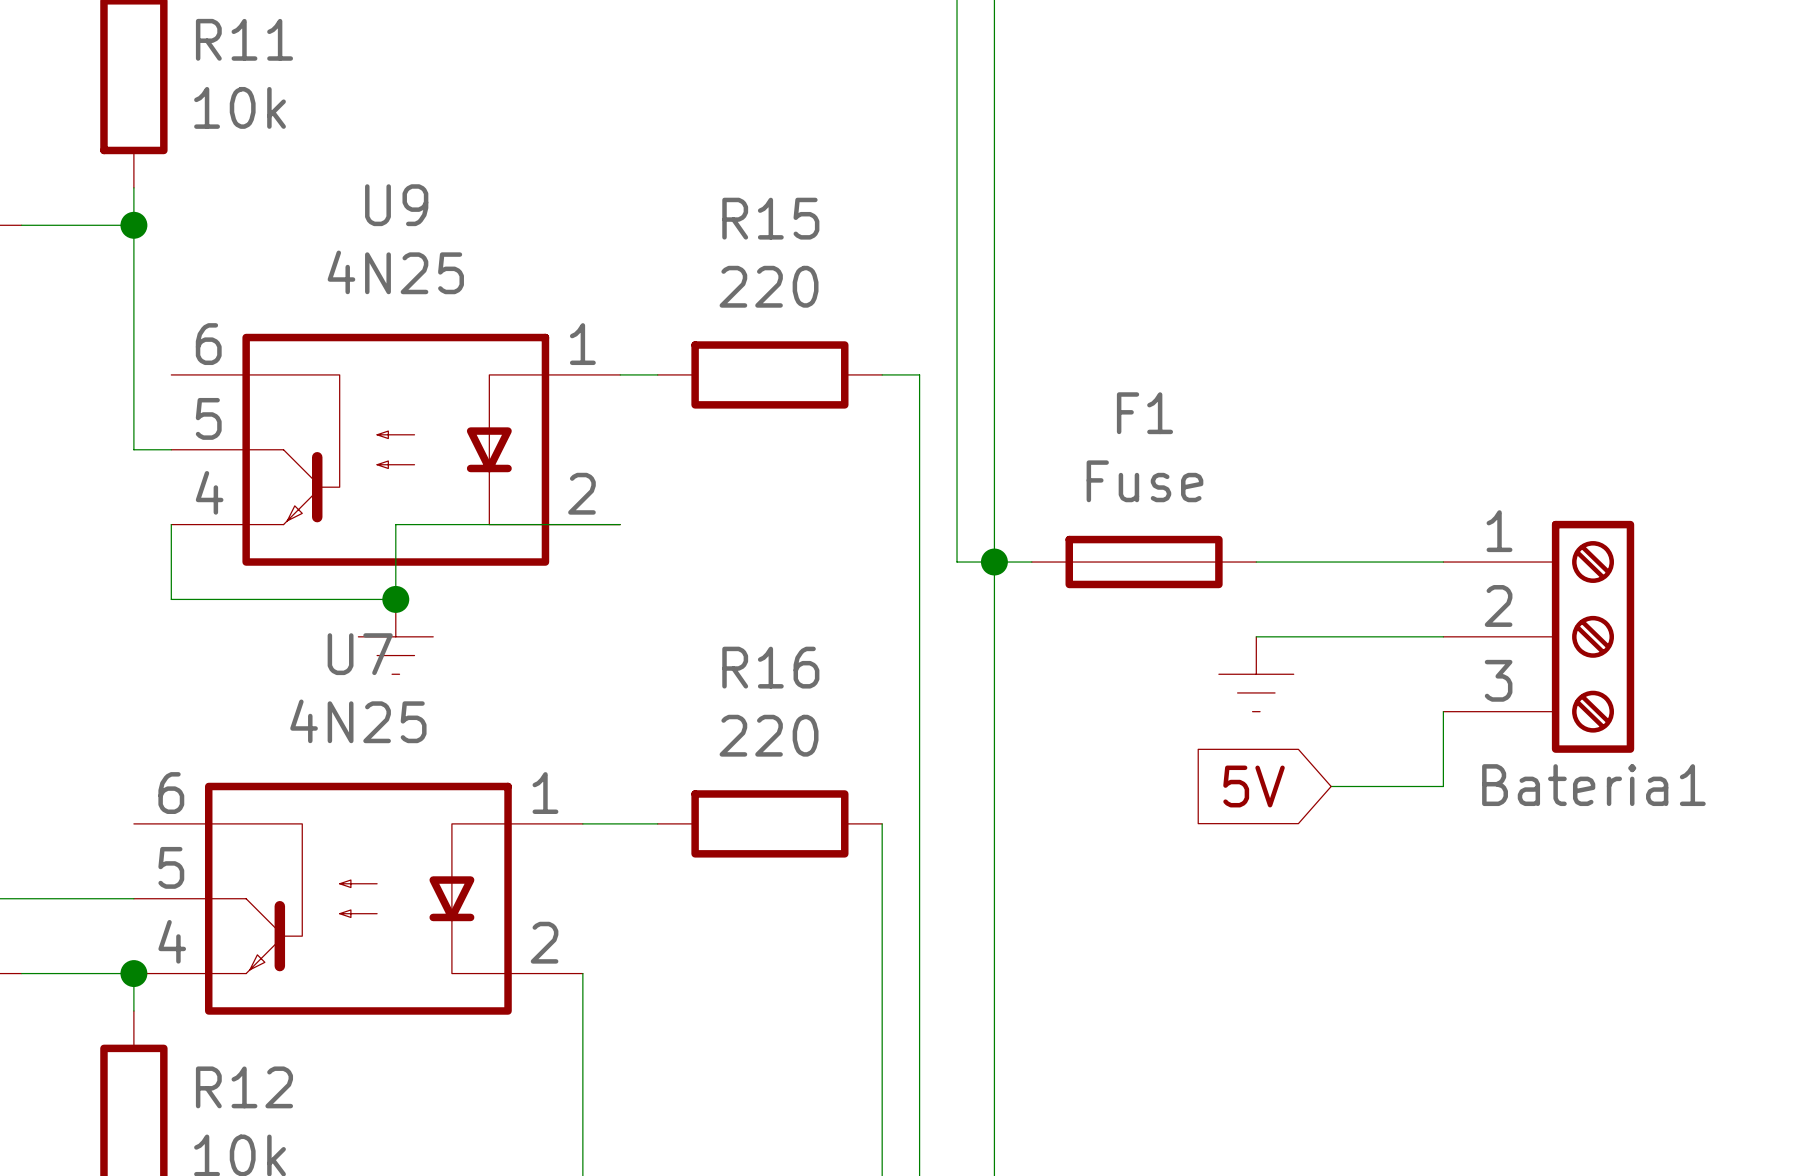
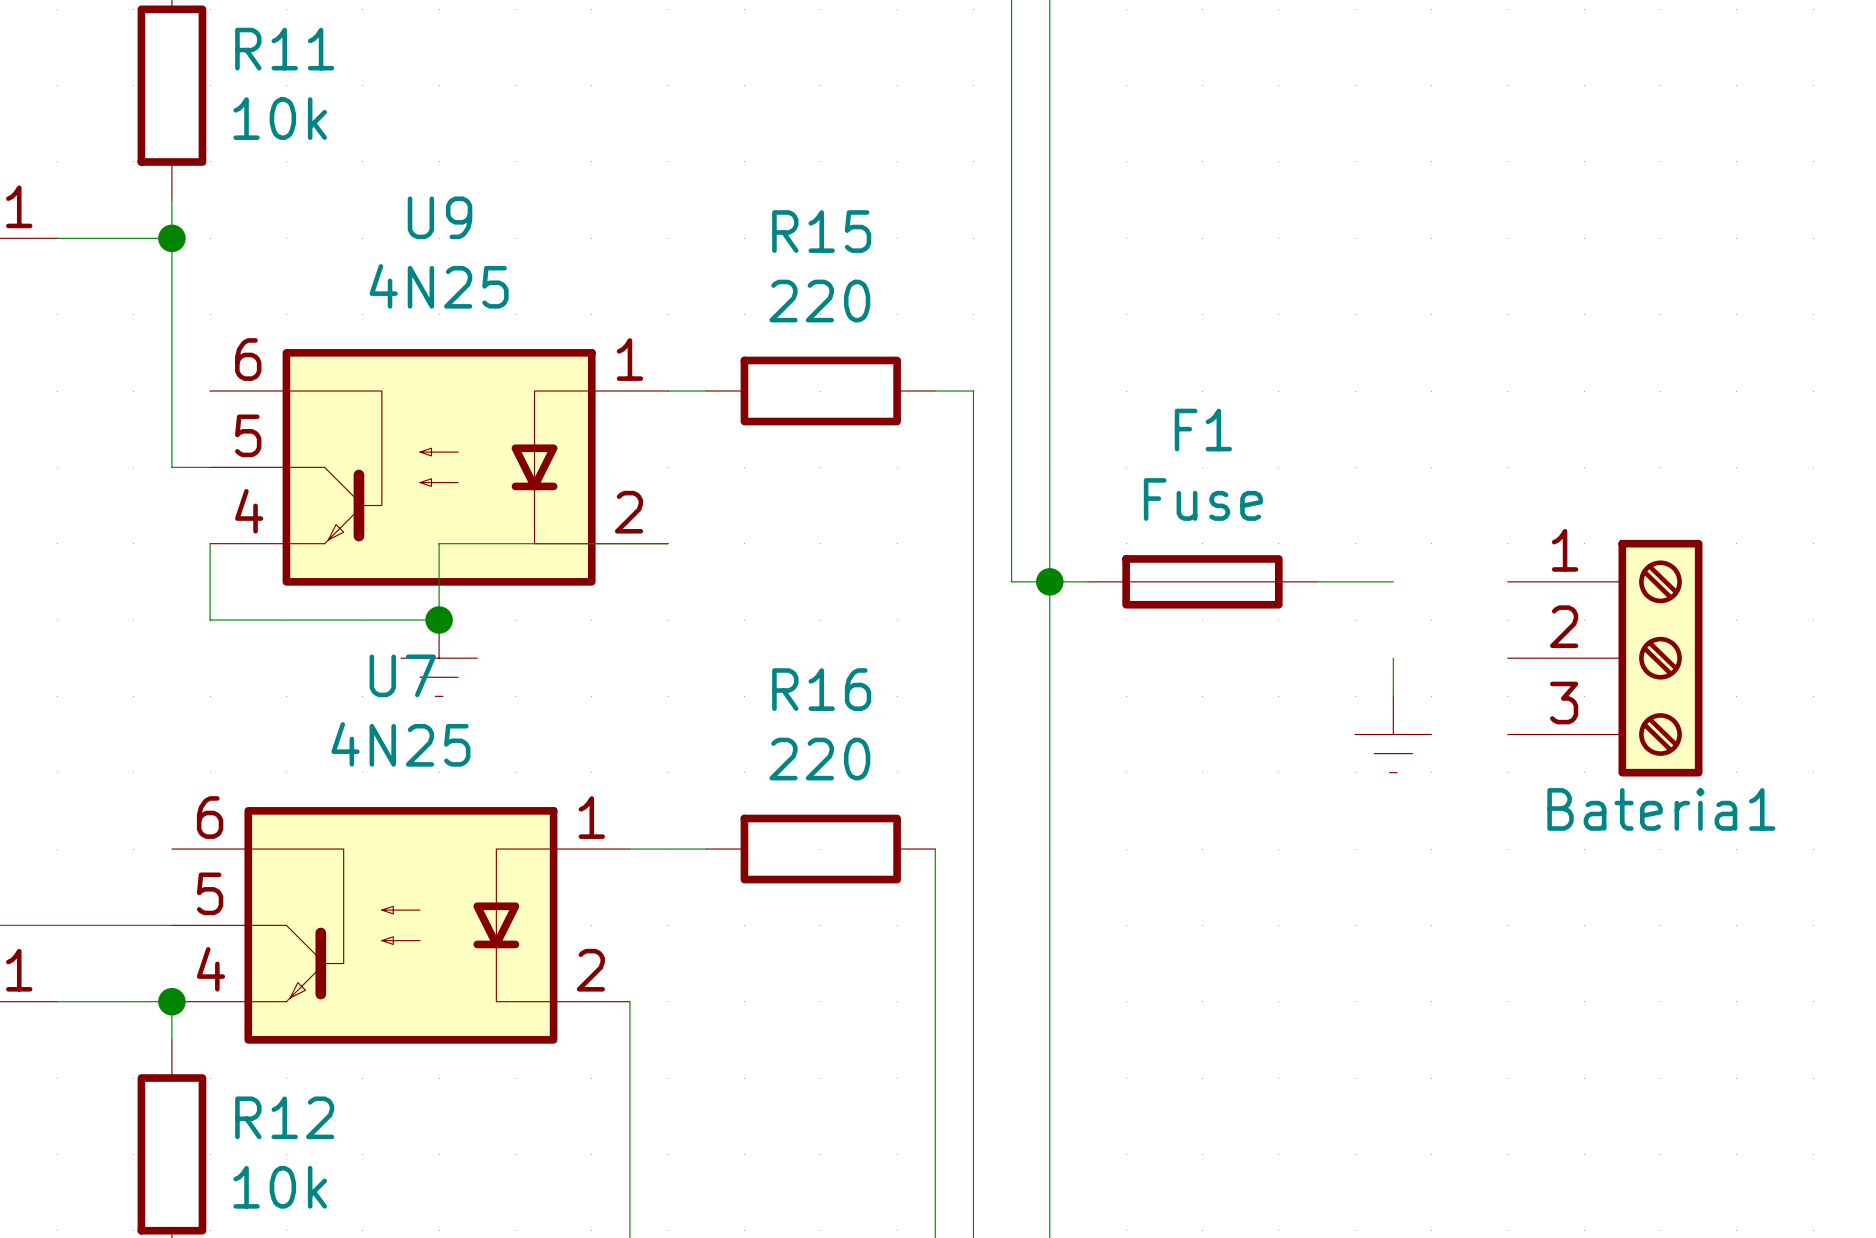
wire: (1331, 562) (1443, 562) -> none
wire: (1256, 636) (1443, 636) -> none
wire: none -> (1393, 658) (1393, 696)
power symbol position: (1256, 674) -> (1393, 734)
wire: (1443, 711) (1443, 786) (1331, 786) -> none
global label: 5V (1254, 786) -> none

